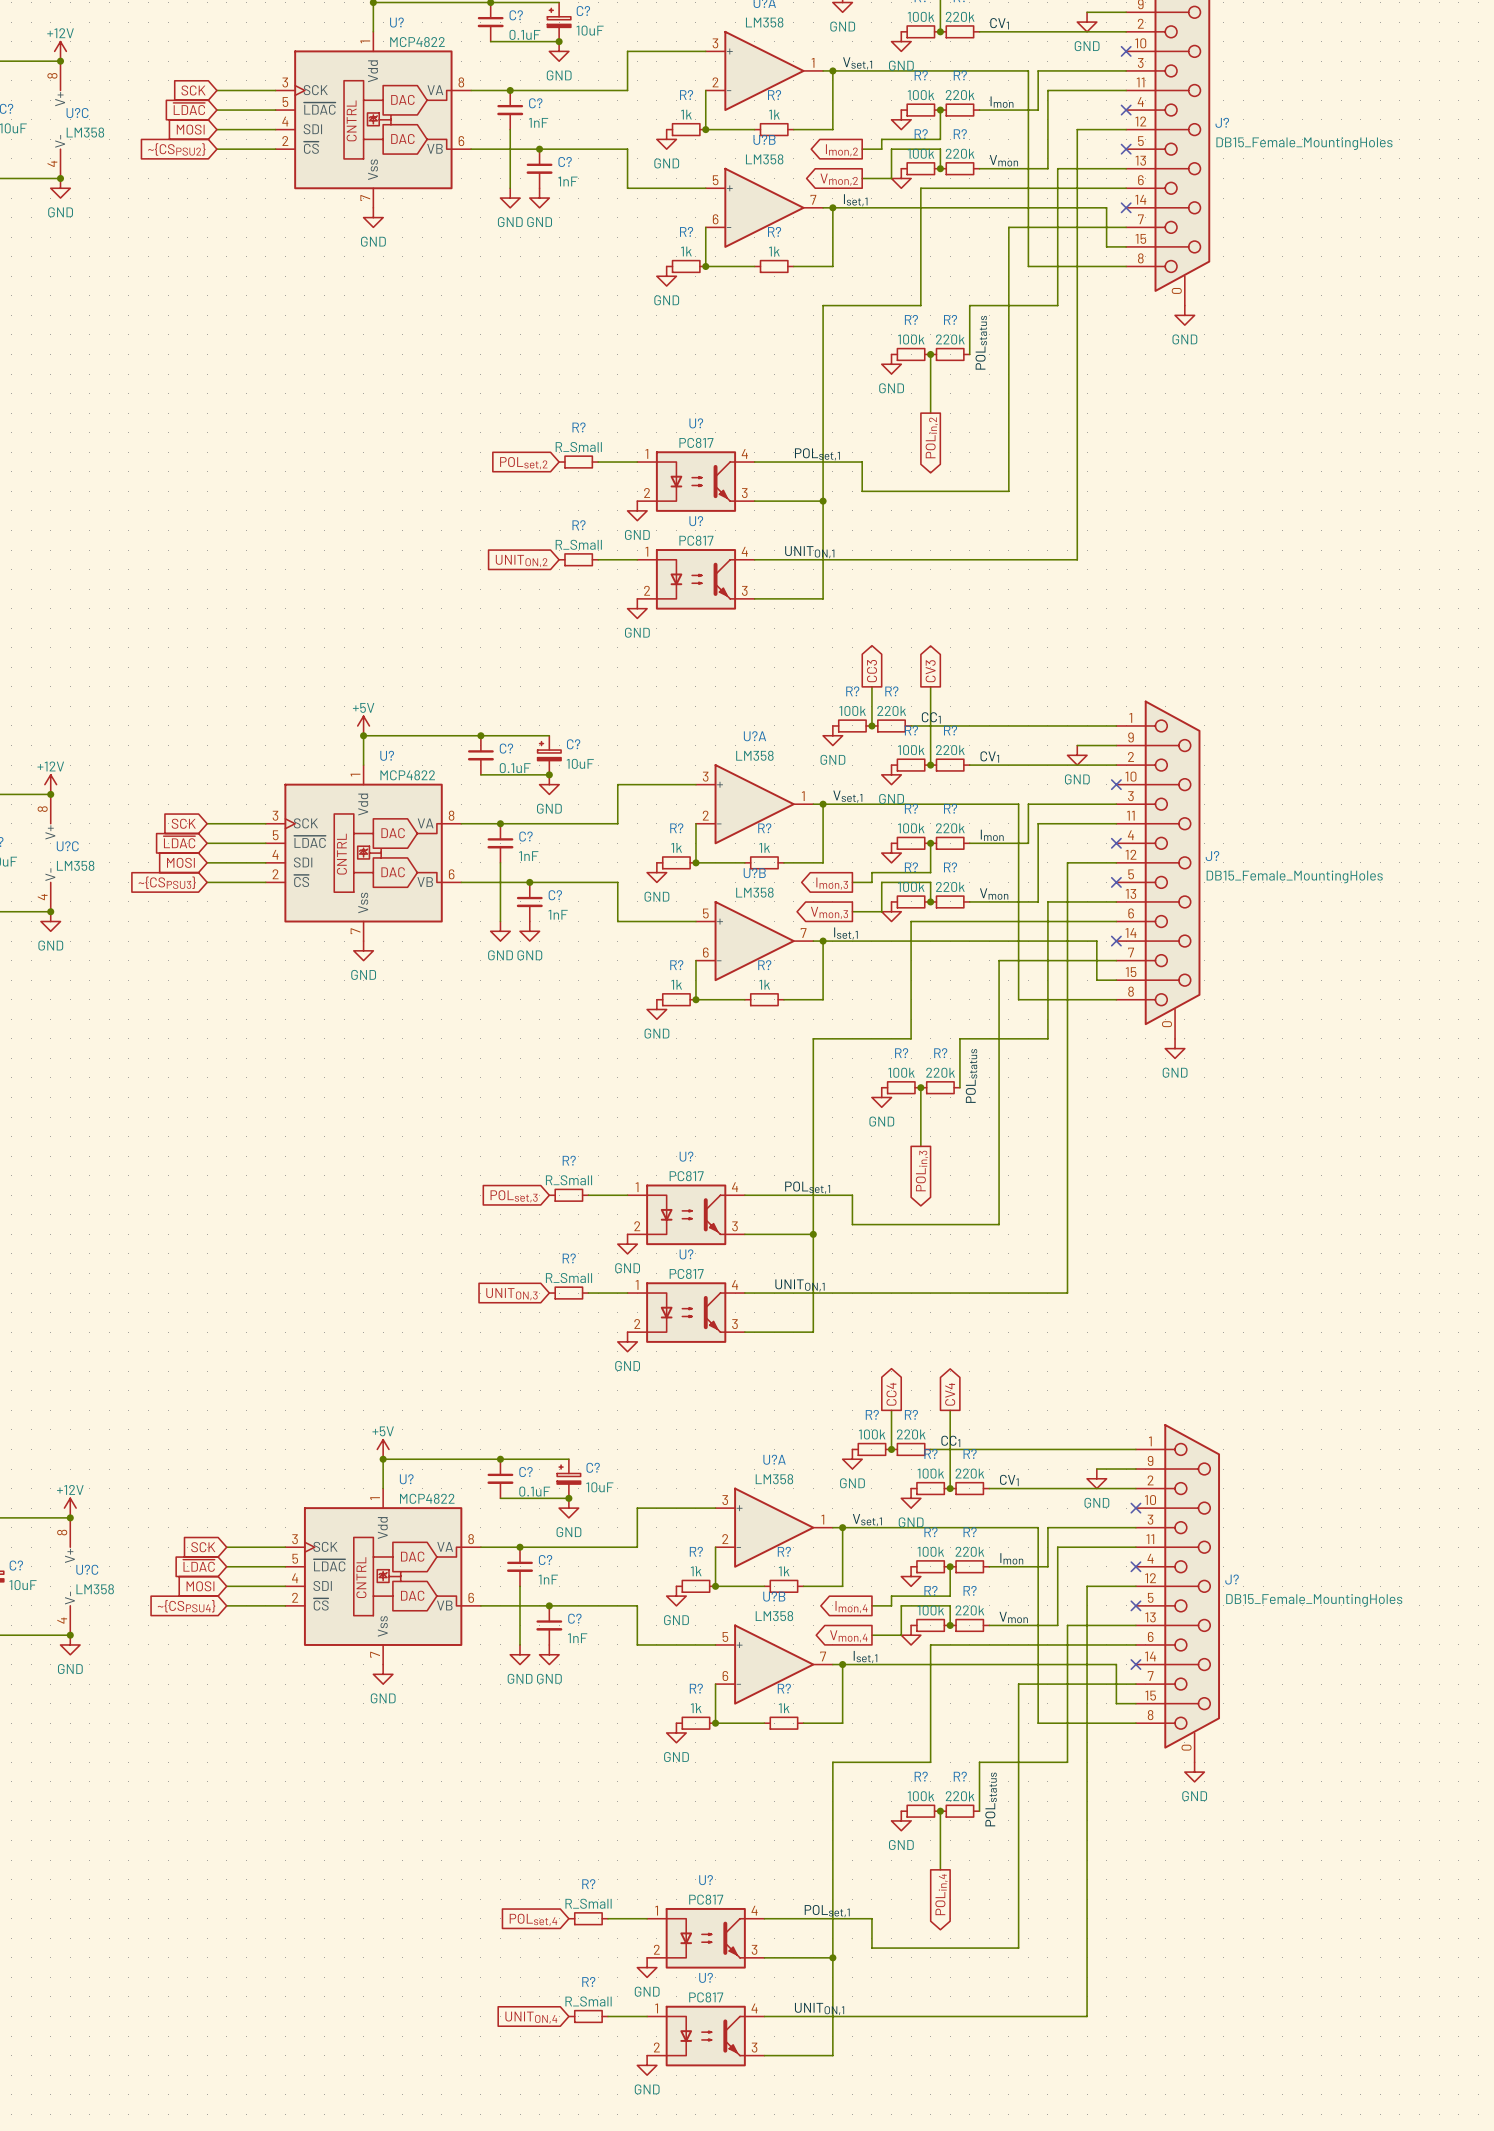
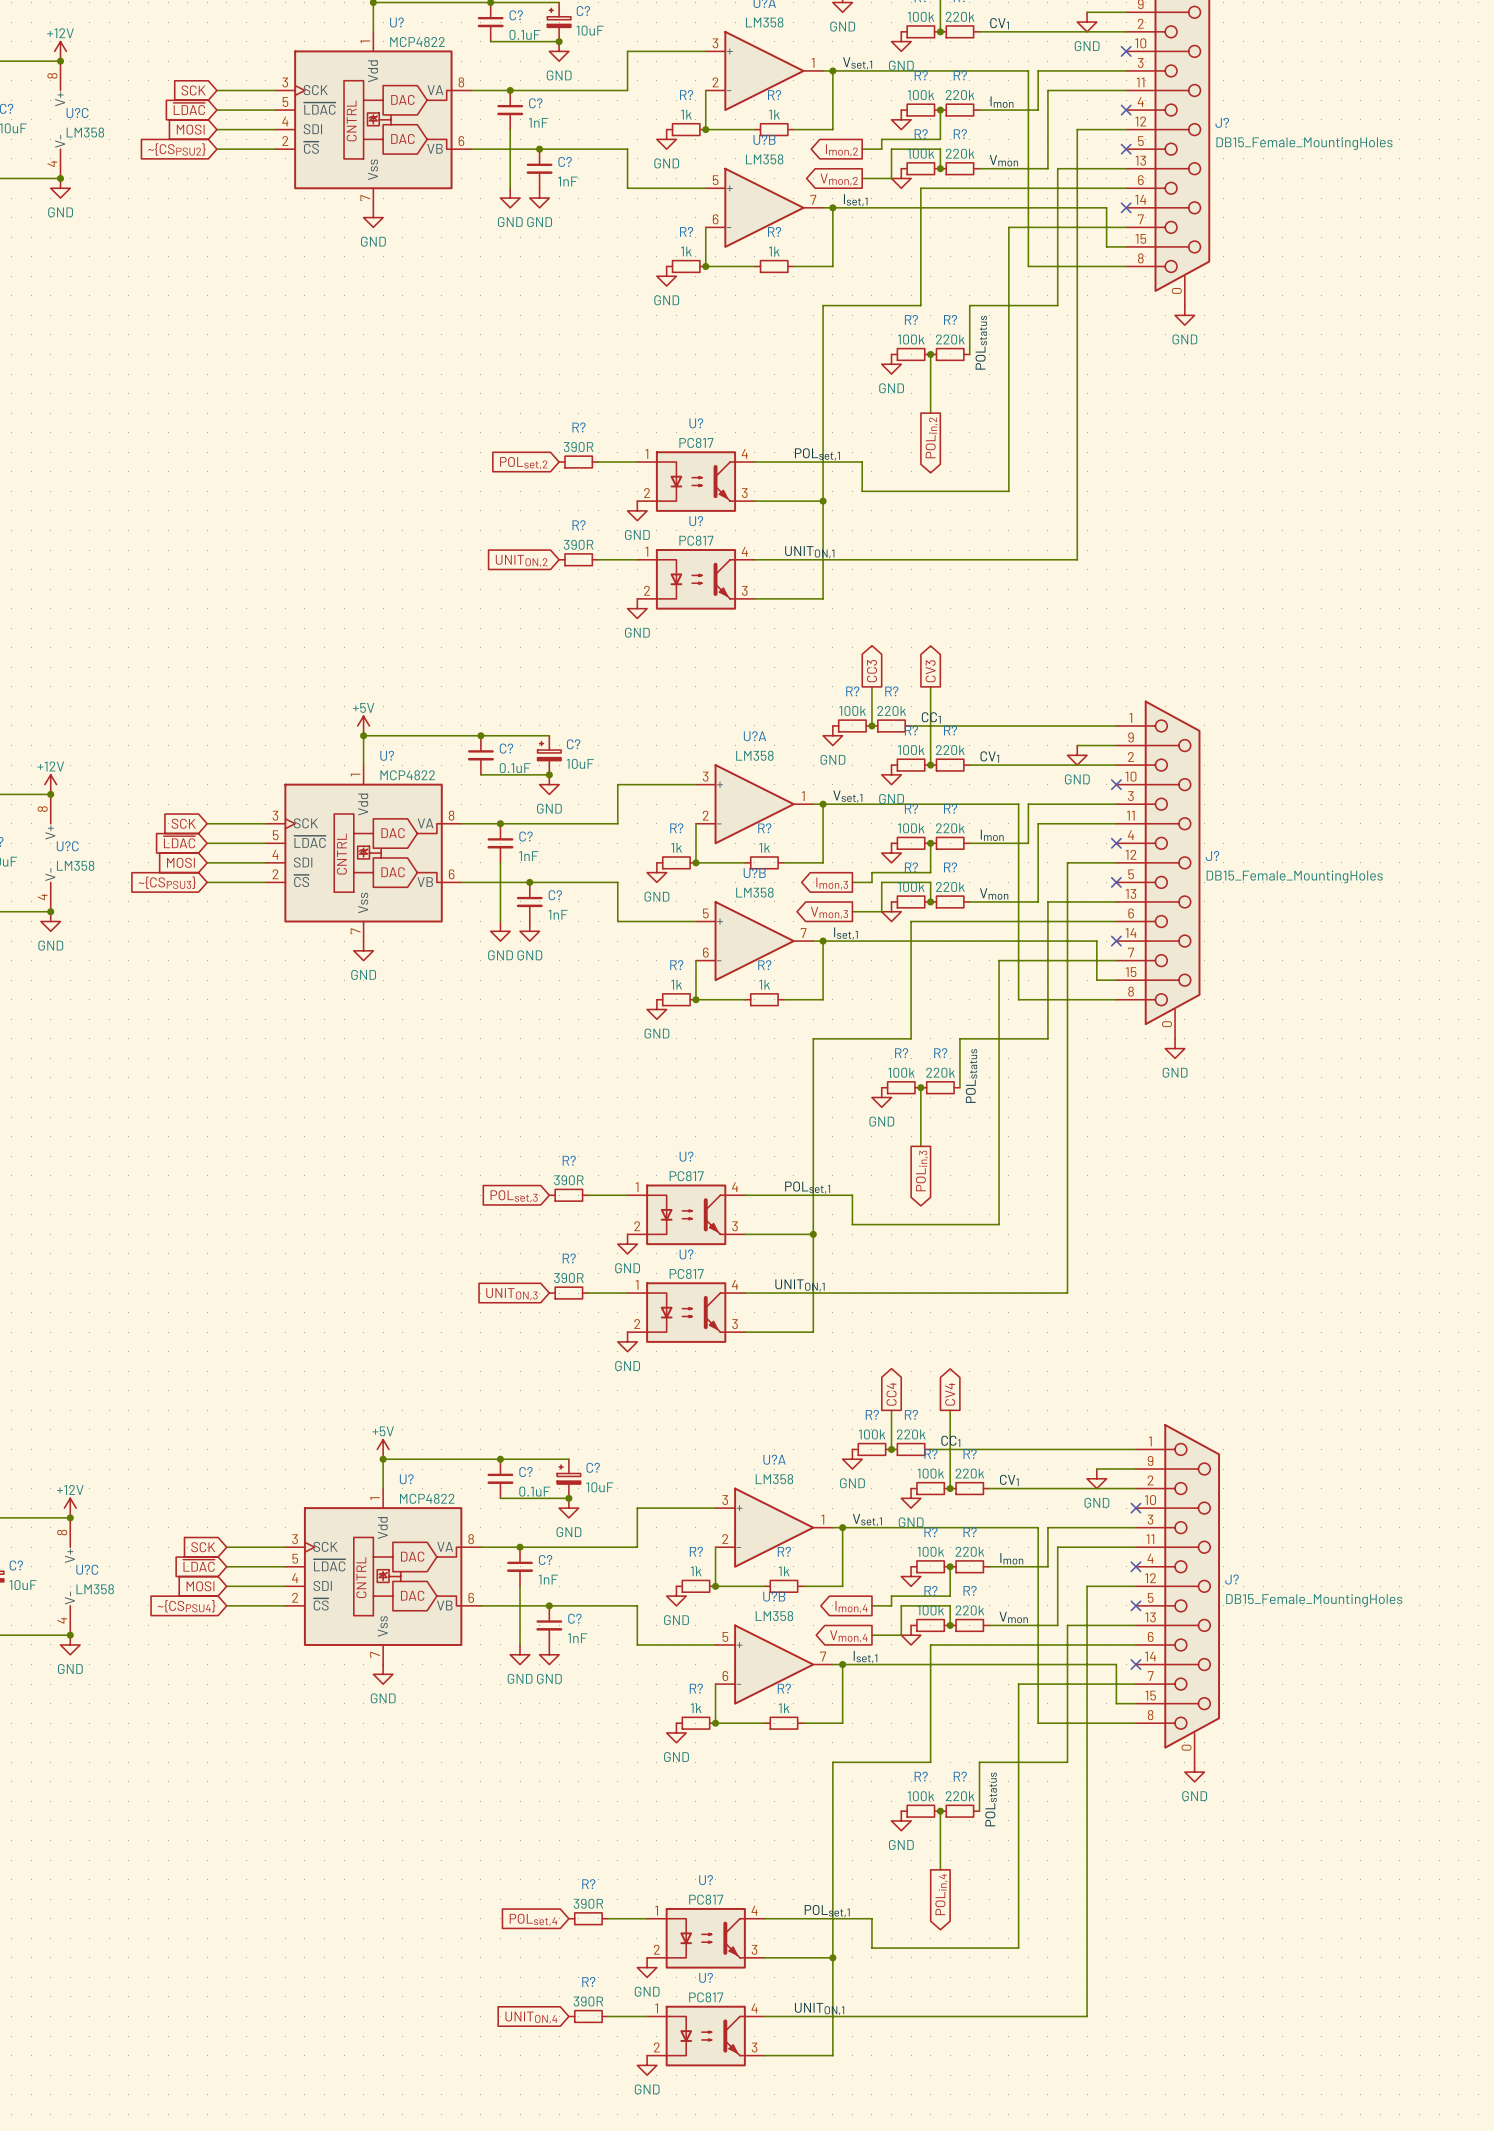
R? value: R_Small (578, 447) -> 390R (578, 447)
R? value: R_Small (578, 544) -> 390R (578, 544)
R? value: R_Small (568, 1180) -> 390R (568, 1180)
R? value: R_Small (568, 1278) -> 390R (568, 1278)
R? value: R_Small (588, 1903) -> 390R (588, 1903)
R? value: R_Small (588, 2001) -> 390R (588, 2001)

